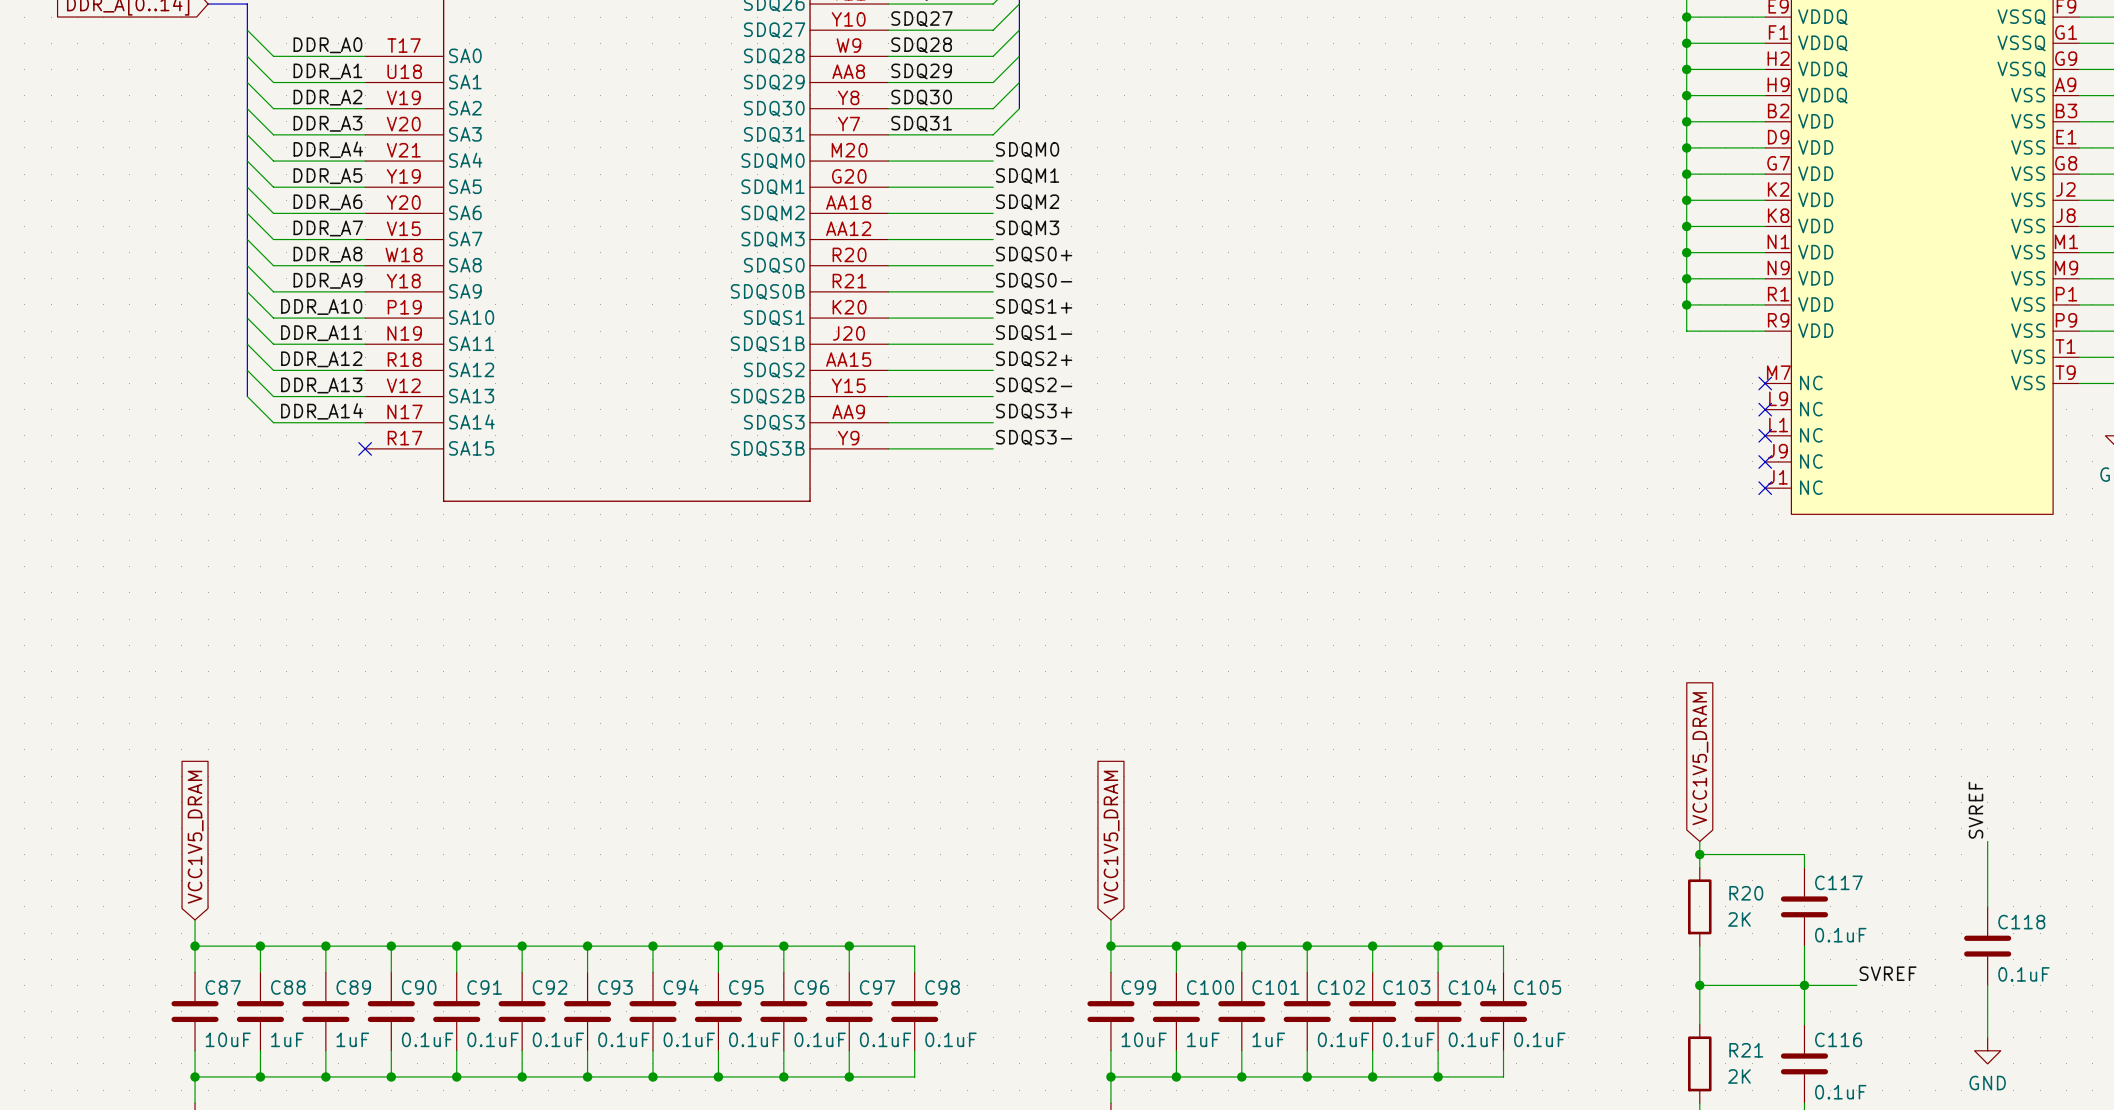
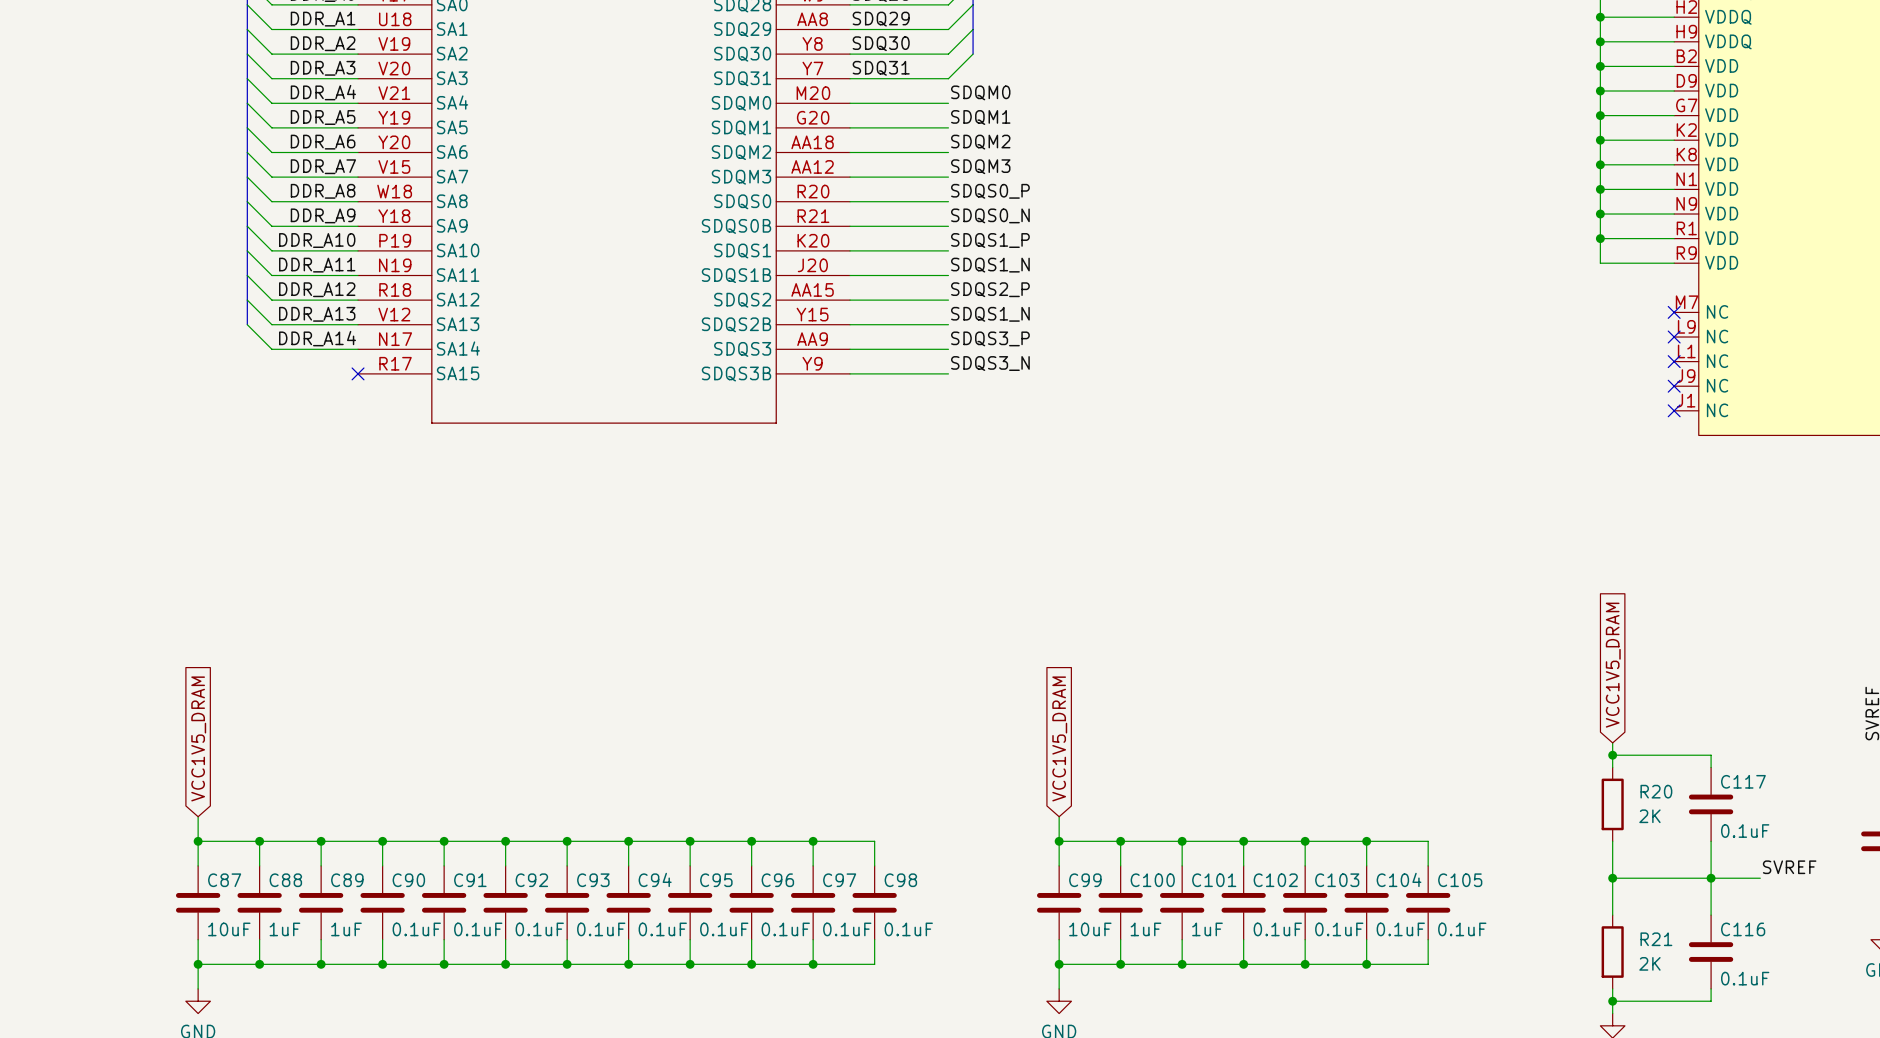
label: SDQS0+ (1034, 254) -> SDQS0_P (990, 191)
label: SDQS0- (1034, 280) -> SDQS0_N (990, 215)
label: SDQS1+ (1034, 307) -> SDQS1_P (990, 240)
label: SDQS1- (1034, 333) -> SDQS1_N (990, 265)
label: SDQS2+ (1034, 359) -> SDQS2_P (990, 289)
label: SDQS2- (1034, 385) -> SDQS1_N (990, 314)
label: SDQS3+ (1034, 411) -> SDQS3_P (990, 338)
label: SDQS3- (1034, 437) -> SDQS3_N (990, 363)

